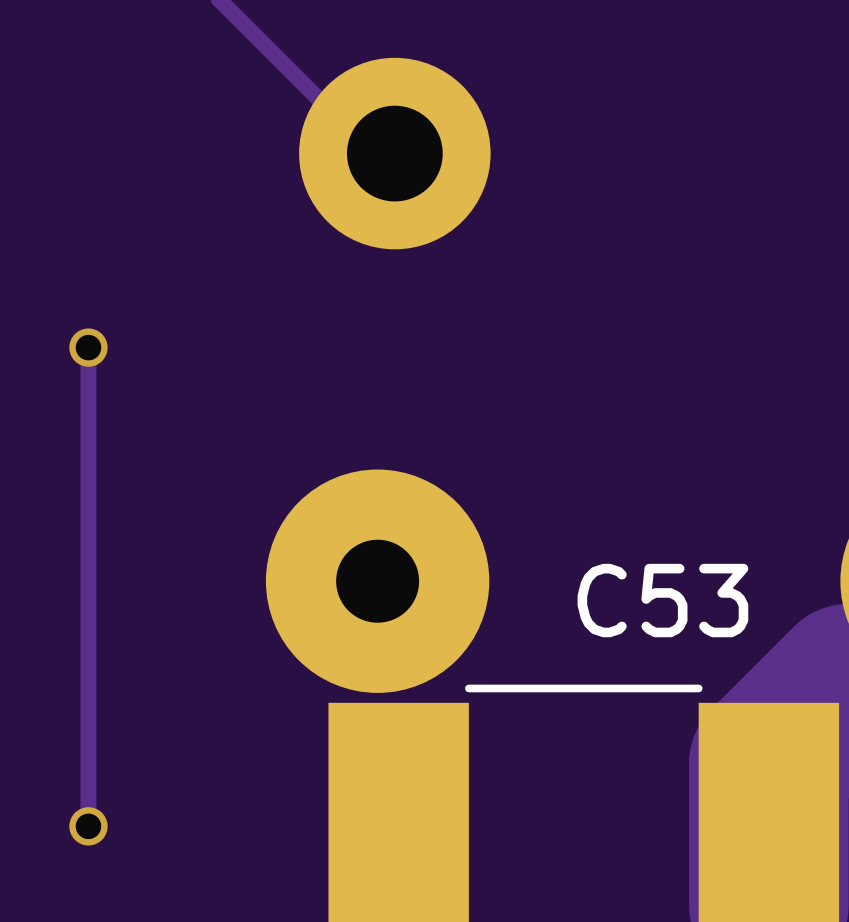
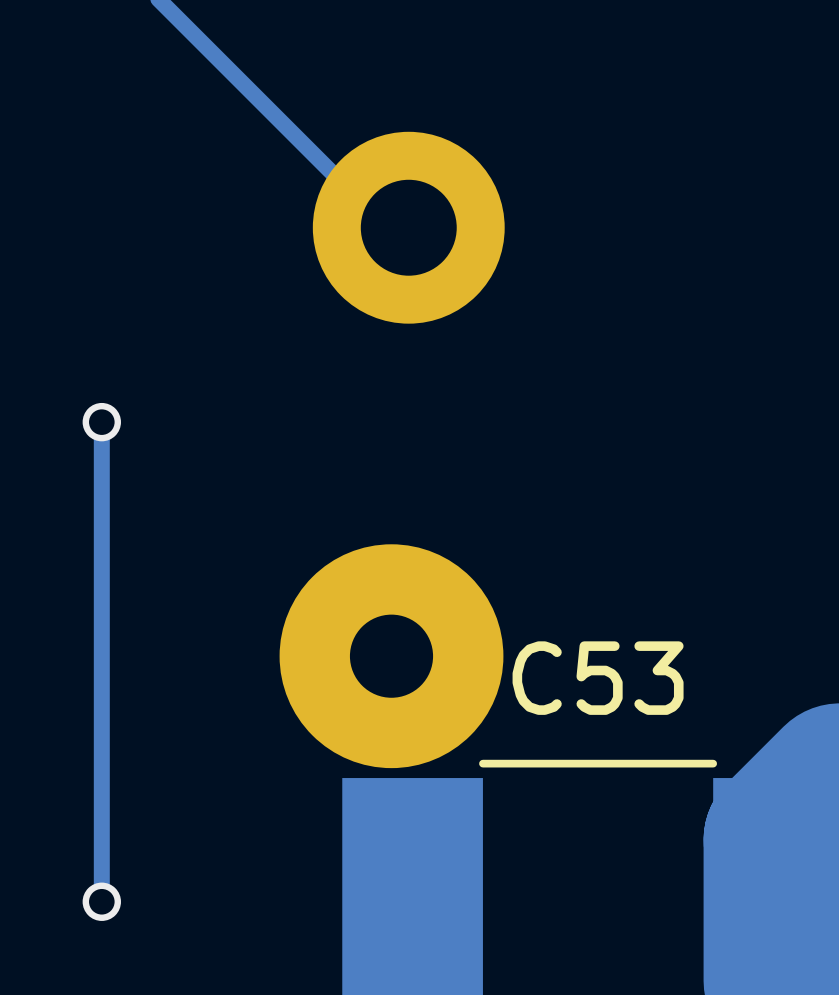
C53 name position: C53 (662, 600) -> C53 (598, 678)

